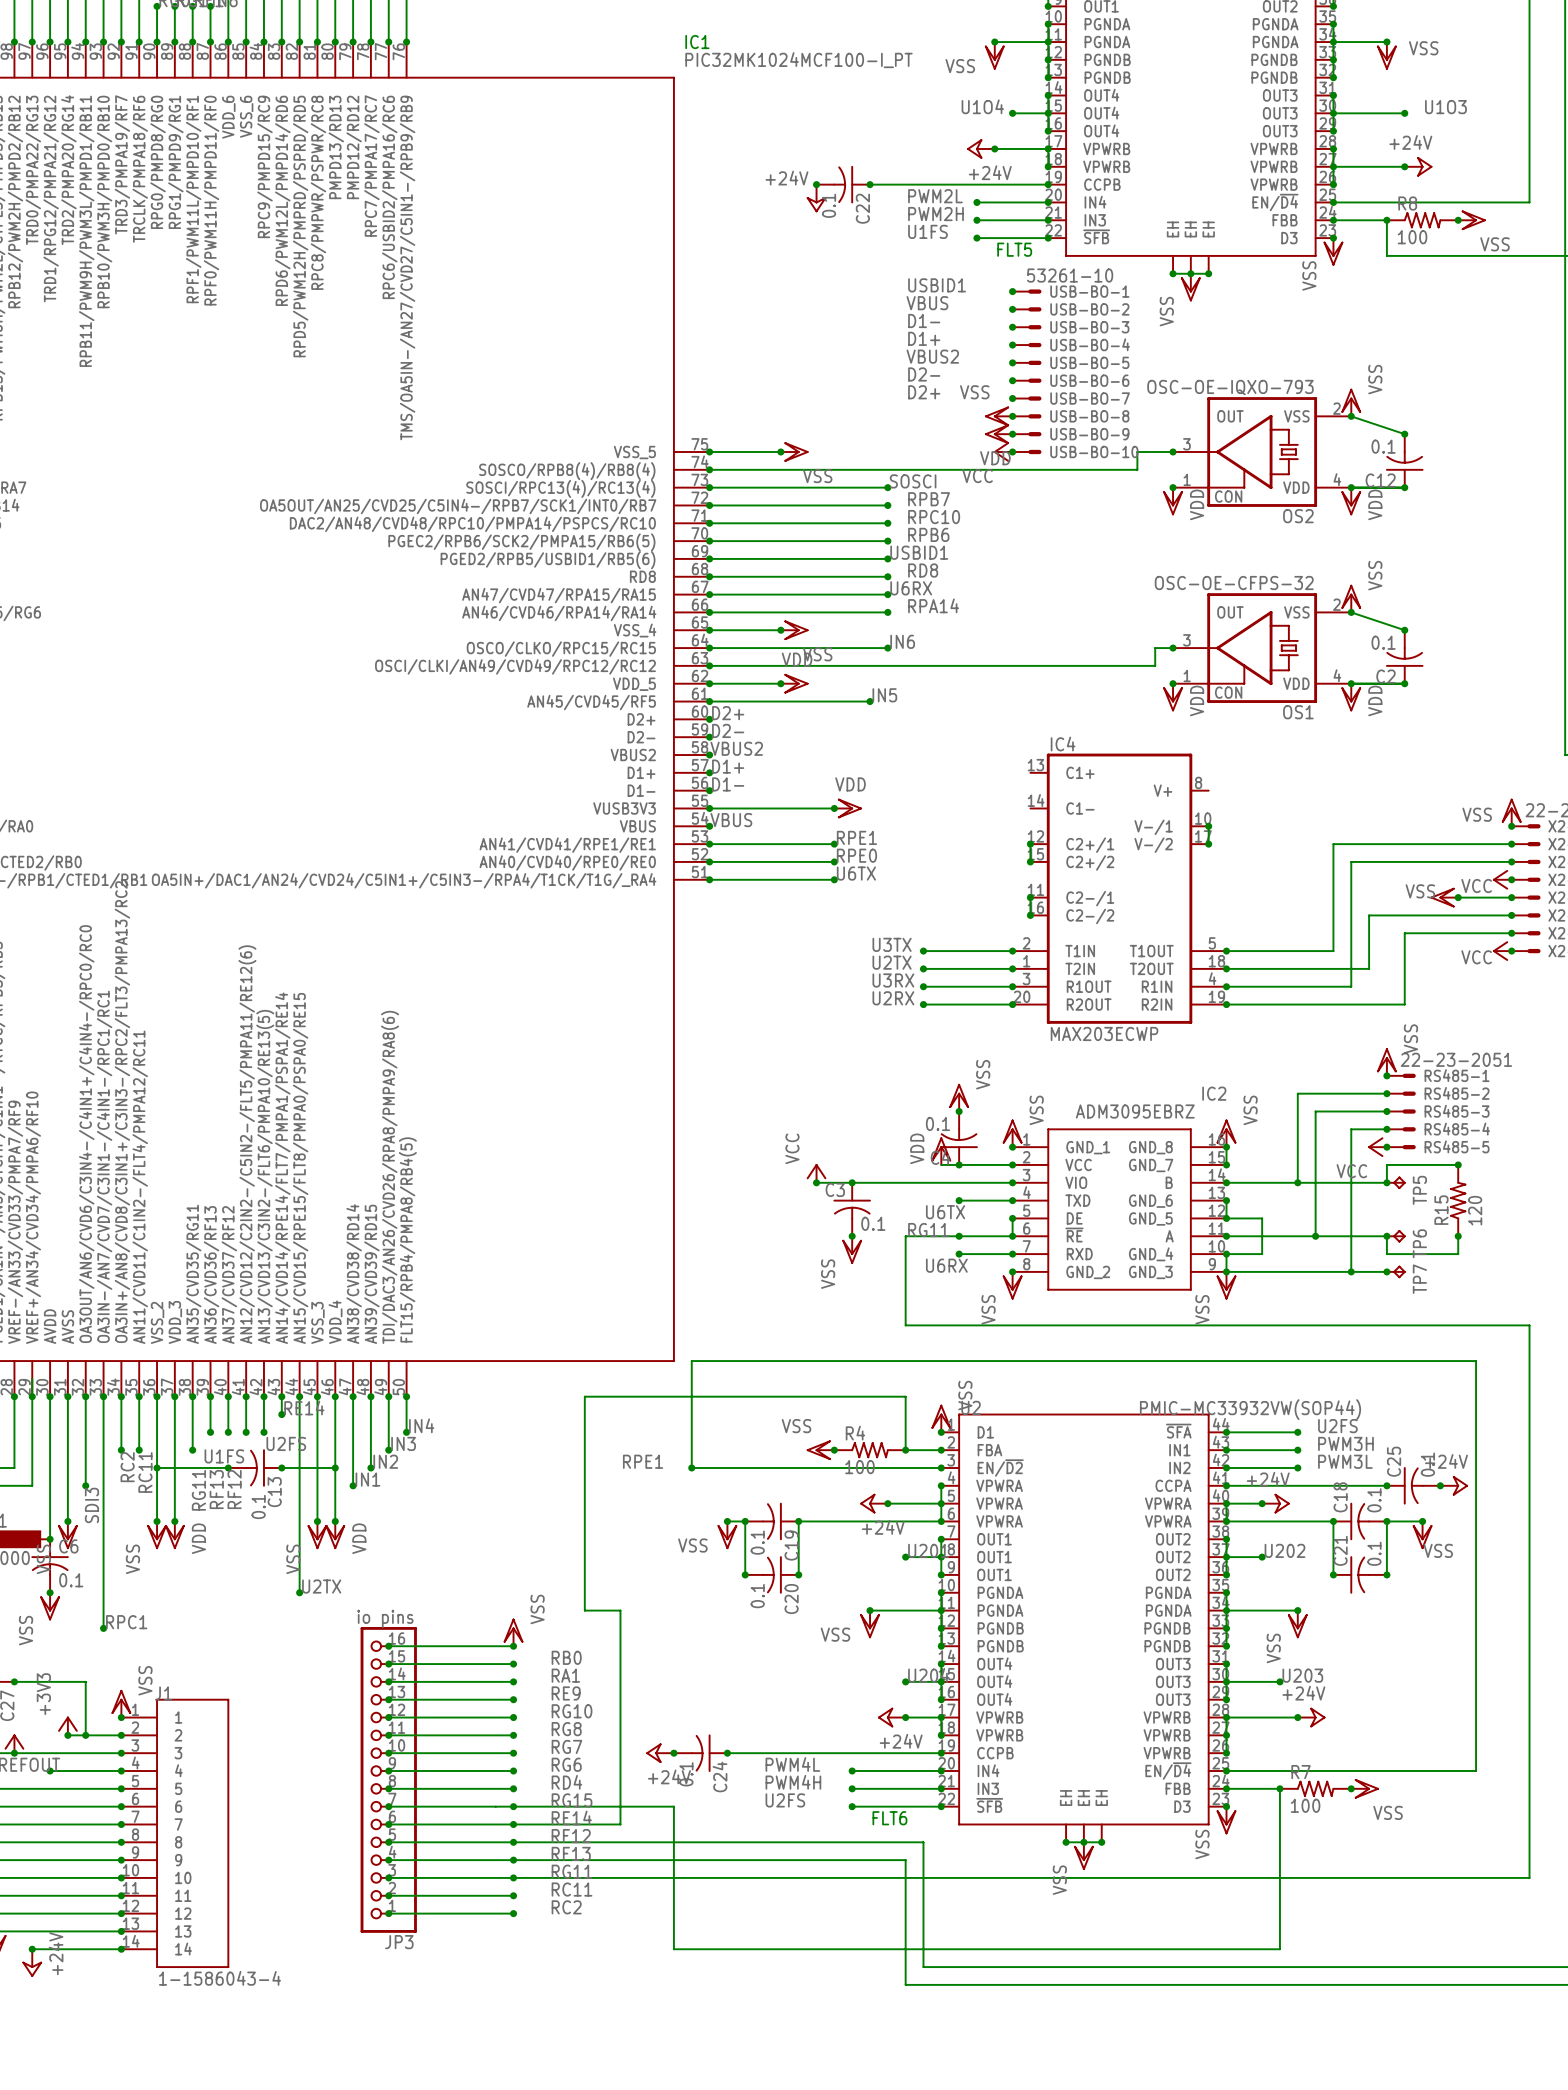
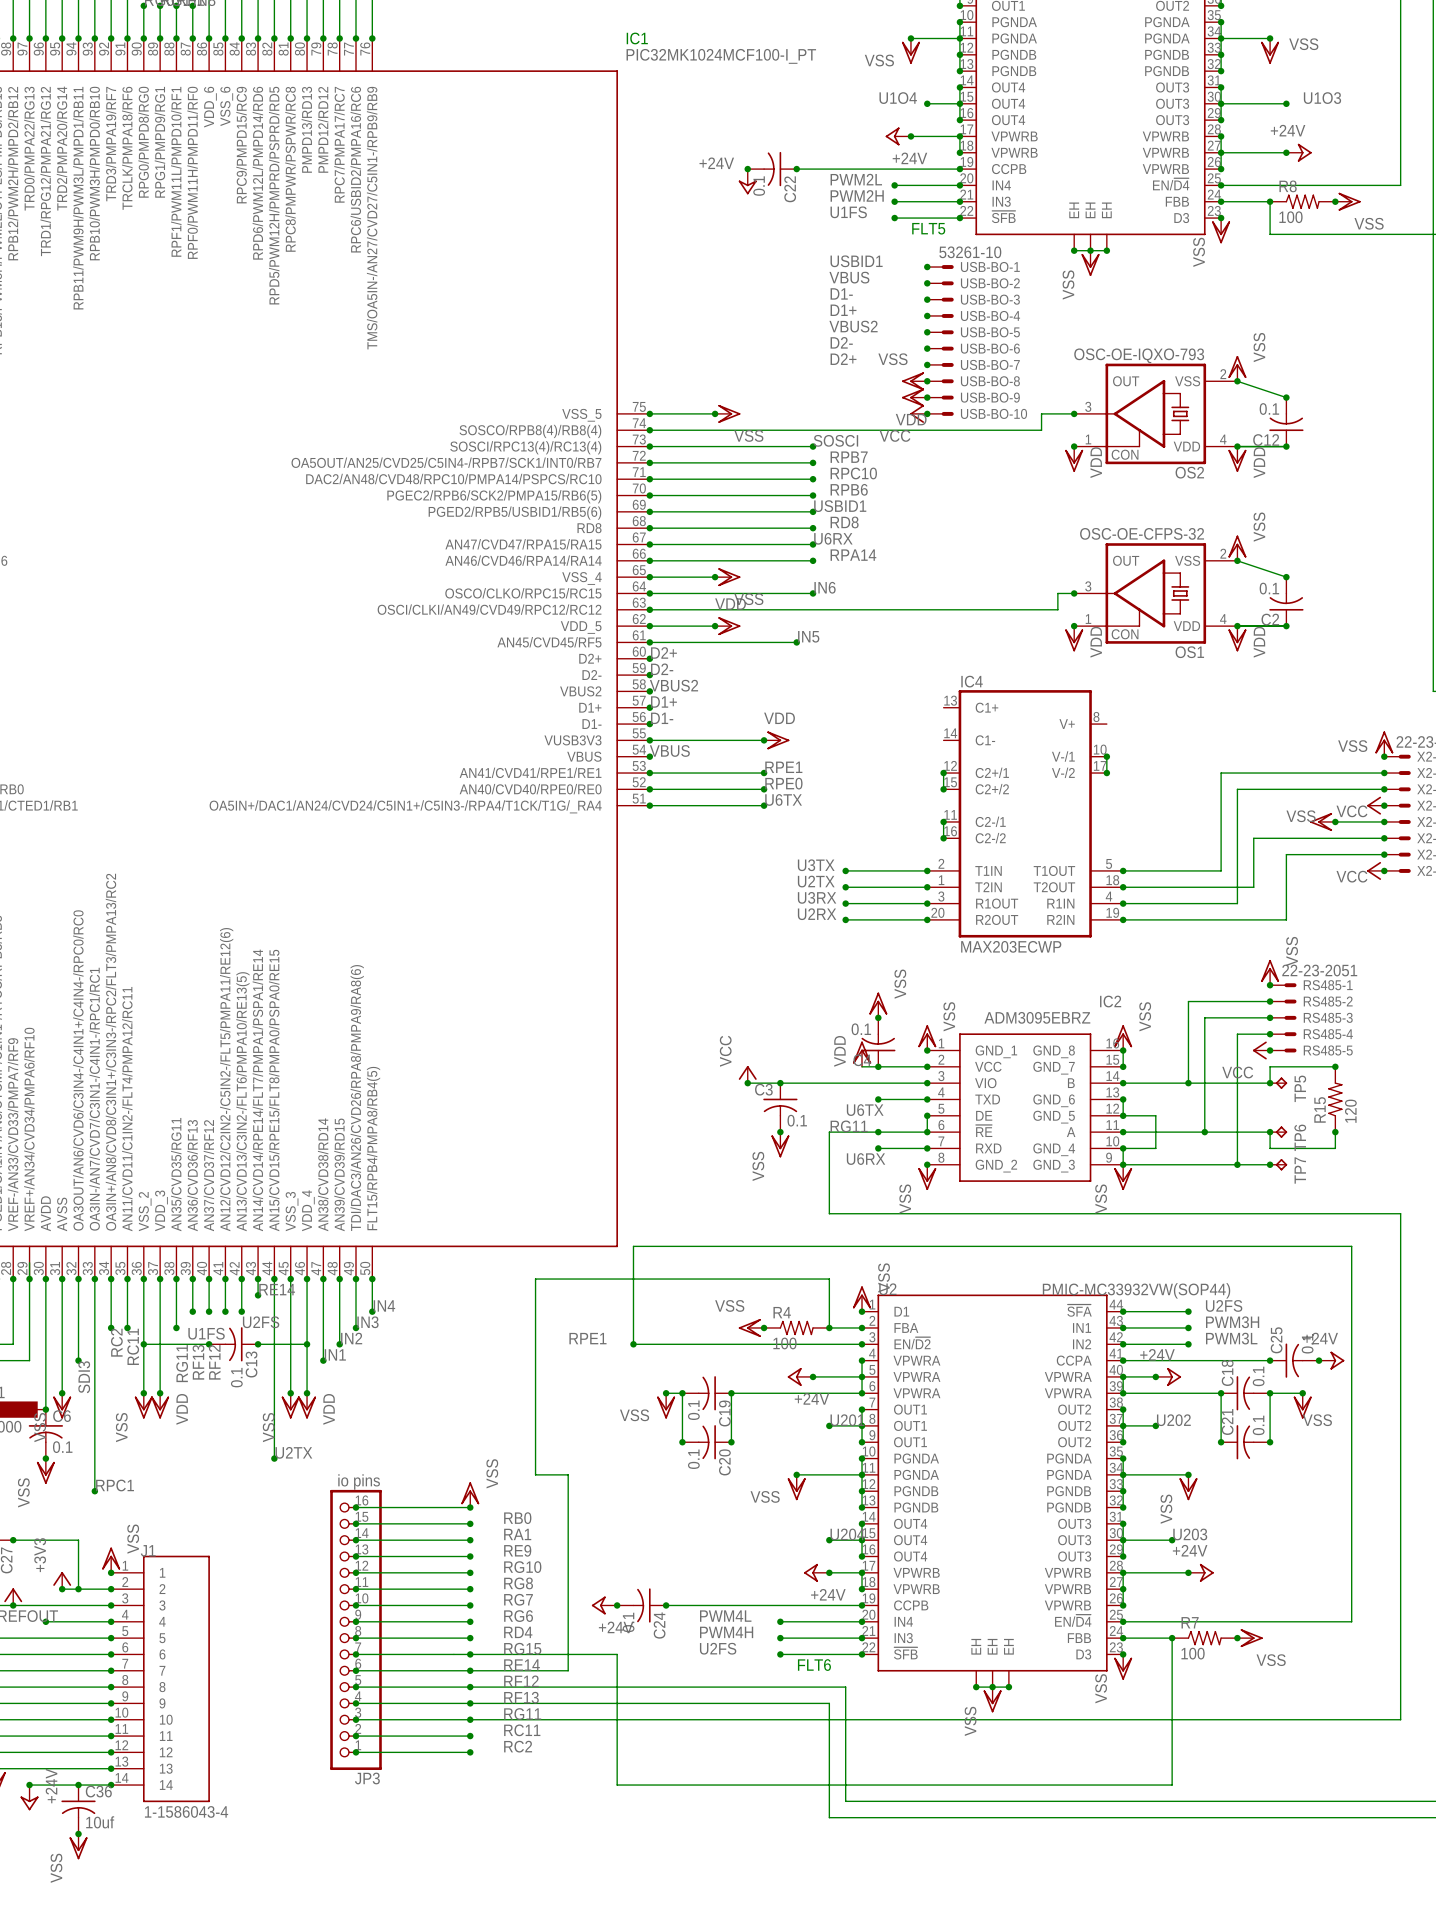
junction: none -> (78, 1785)
C36: none -> 10uf (78, 1809)
junction: none -> (78, 1833)
power symbol: none -> VSS (78, 1846)

